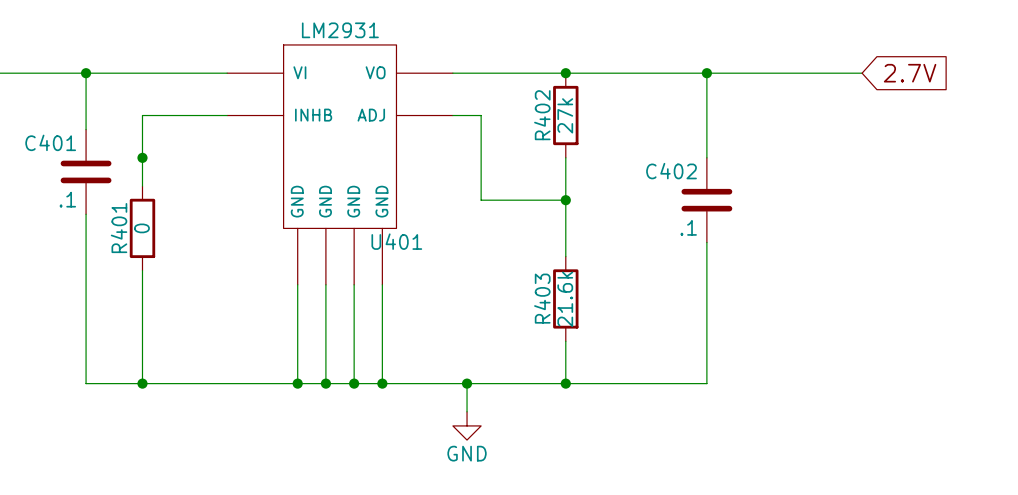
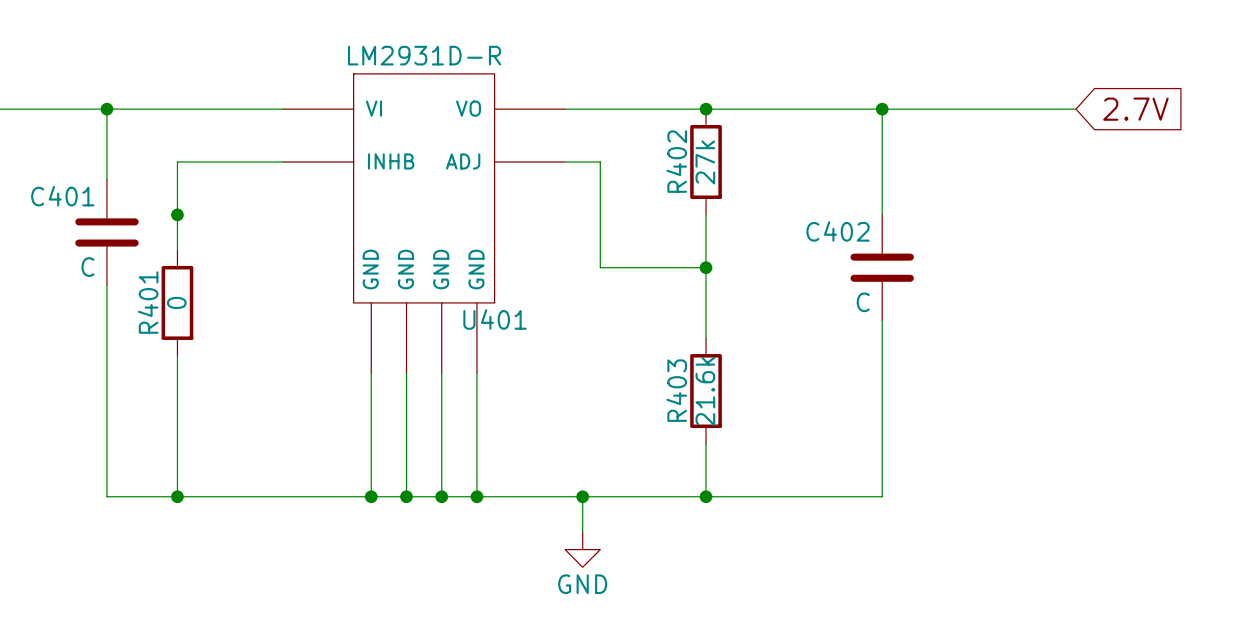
U401 value: LM2931 (340, 30) -> LM2931D-R (424, 55)
C401 value: .1 (67, 199) -> C (87, 267)
C402 value: .1 (688, 227) -> C (863, 302)

